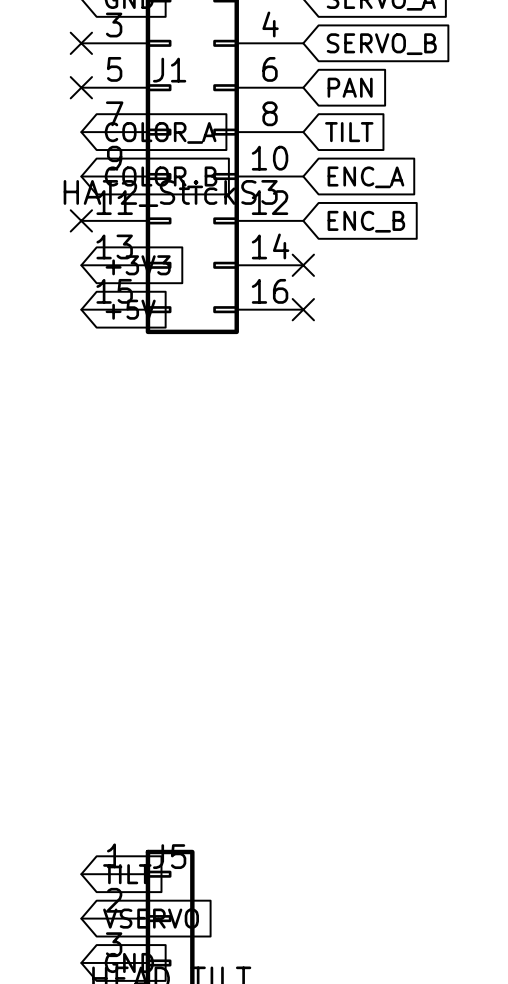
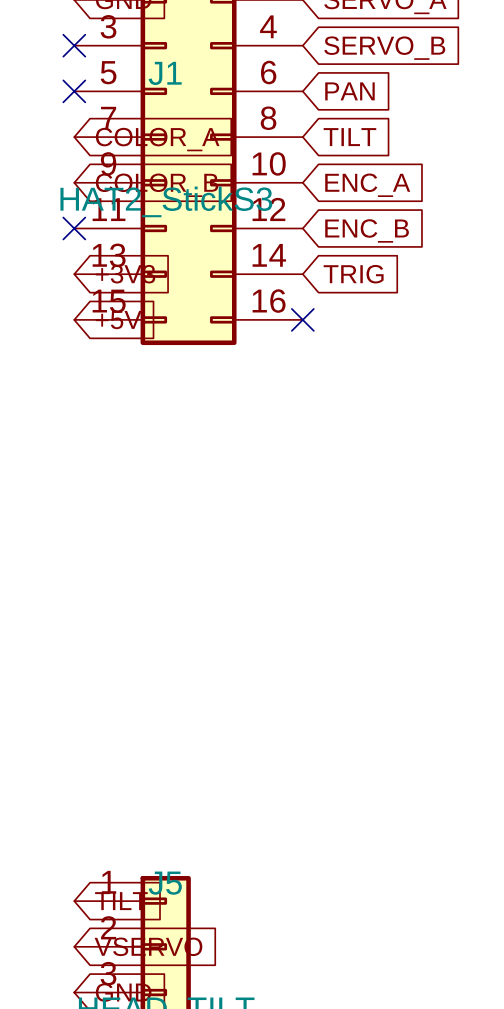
no-connect mark: (303, 265) -> none
global label: none -> TRIG (353, 274)

